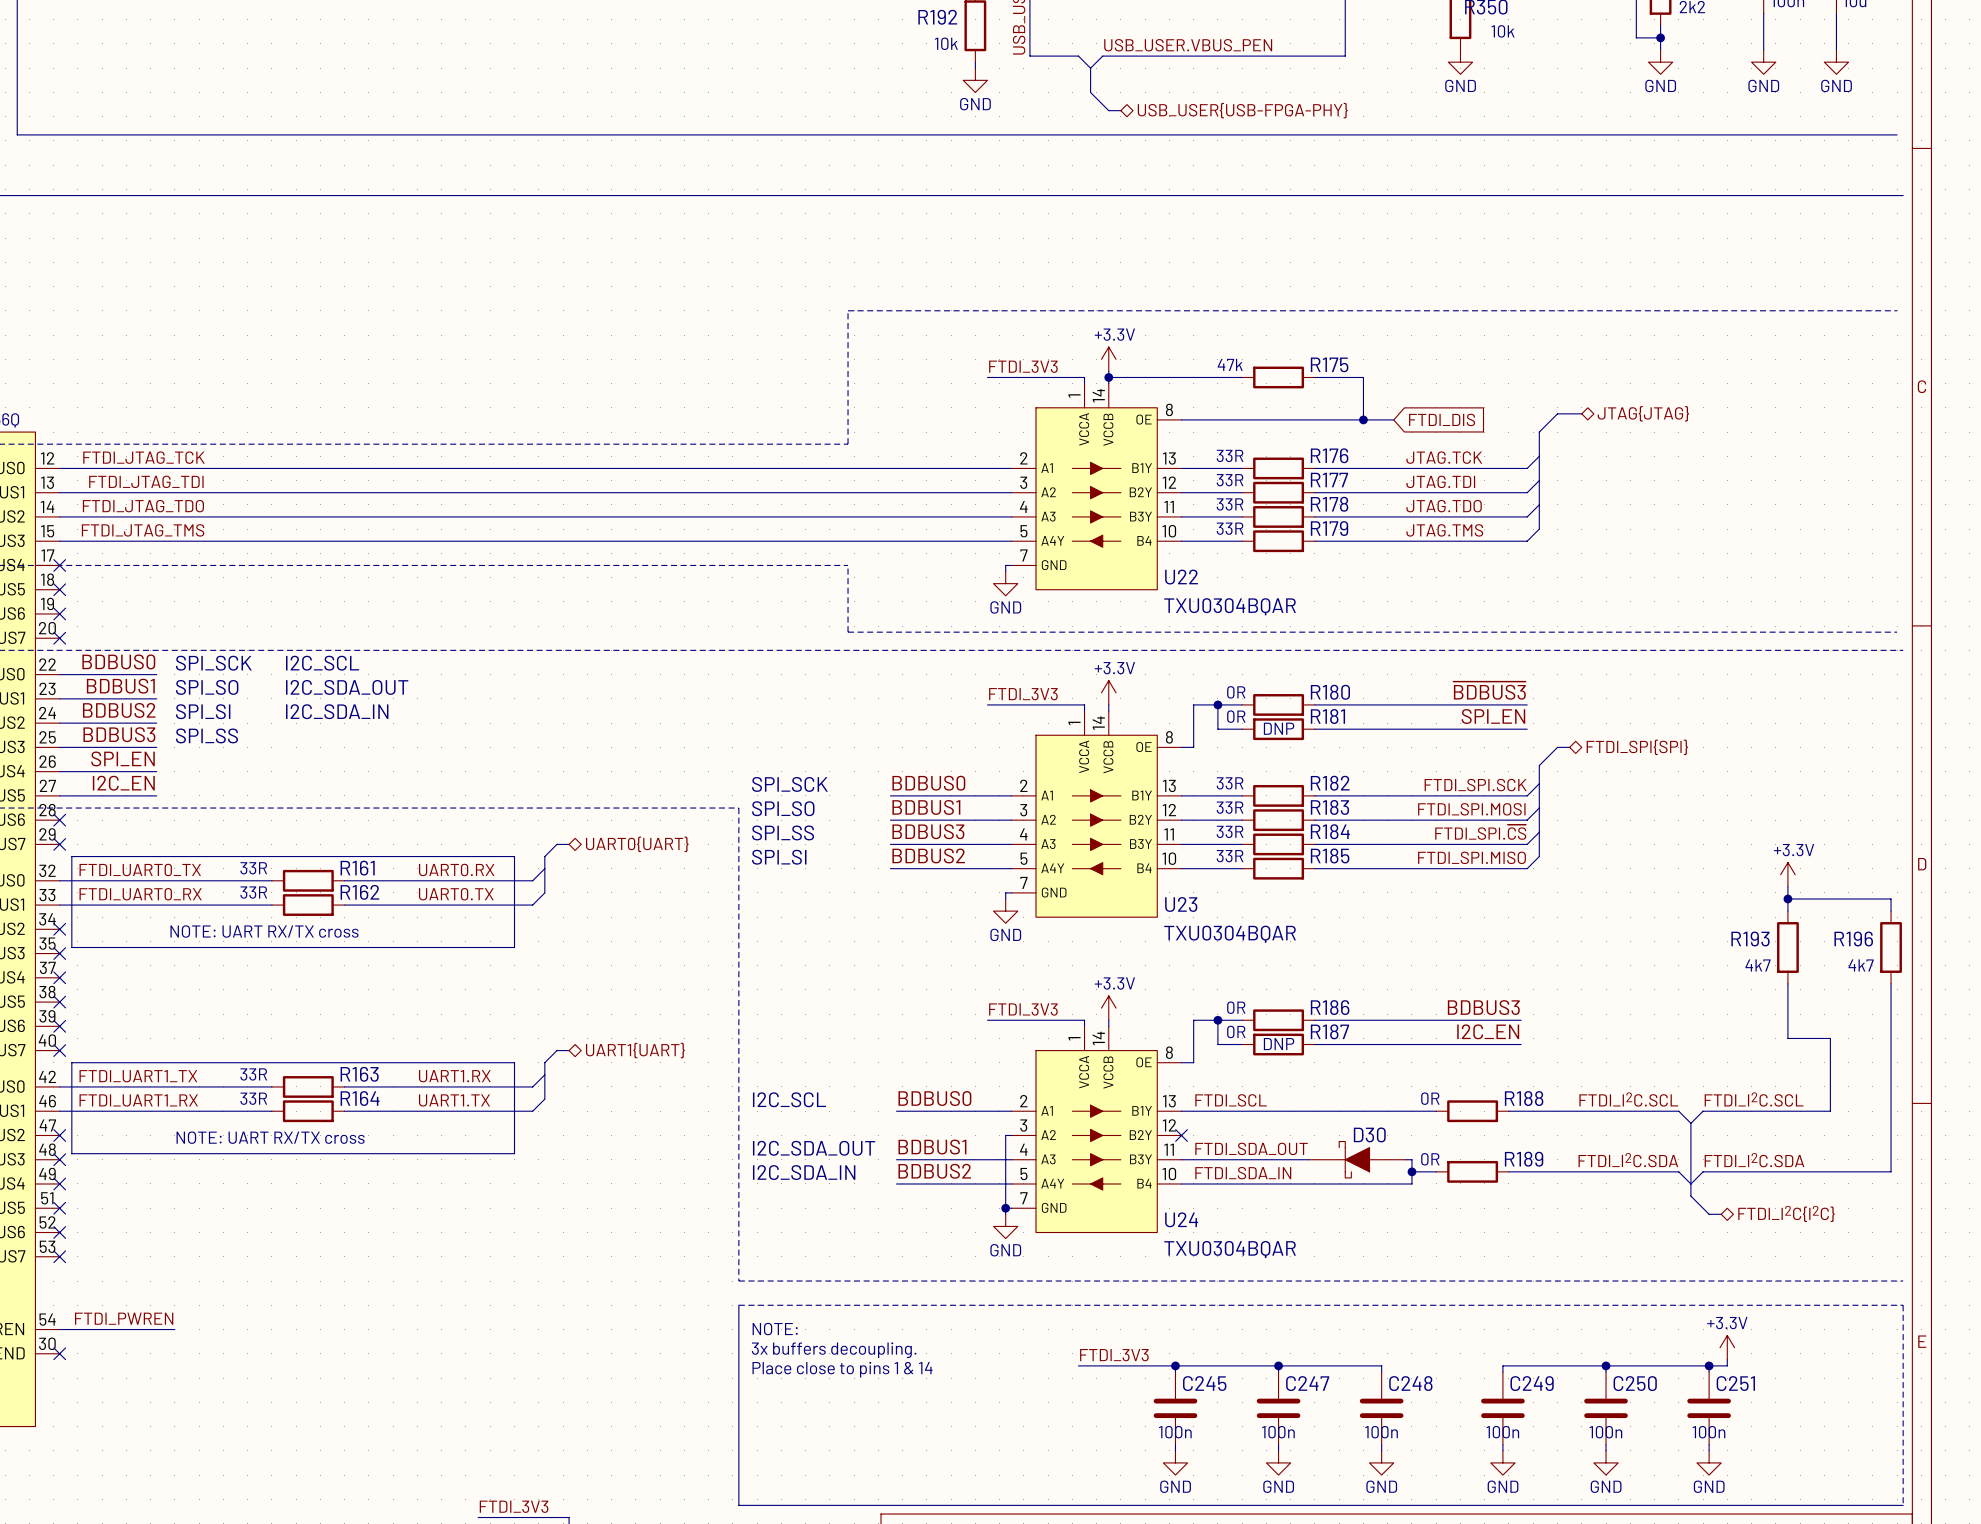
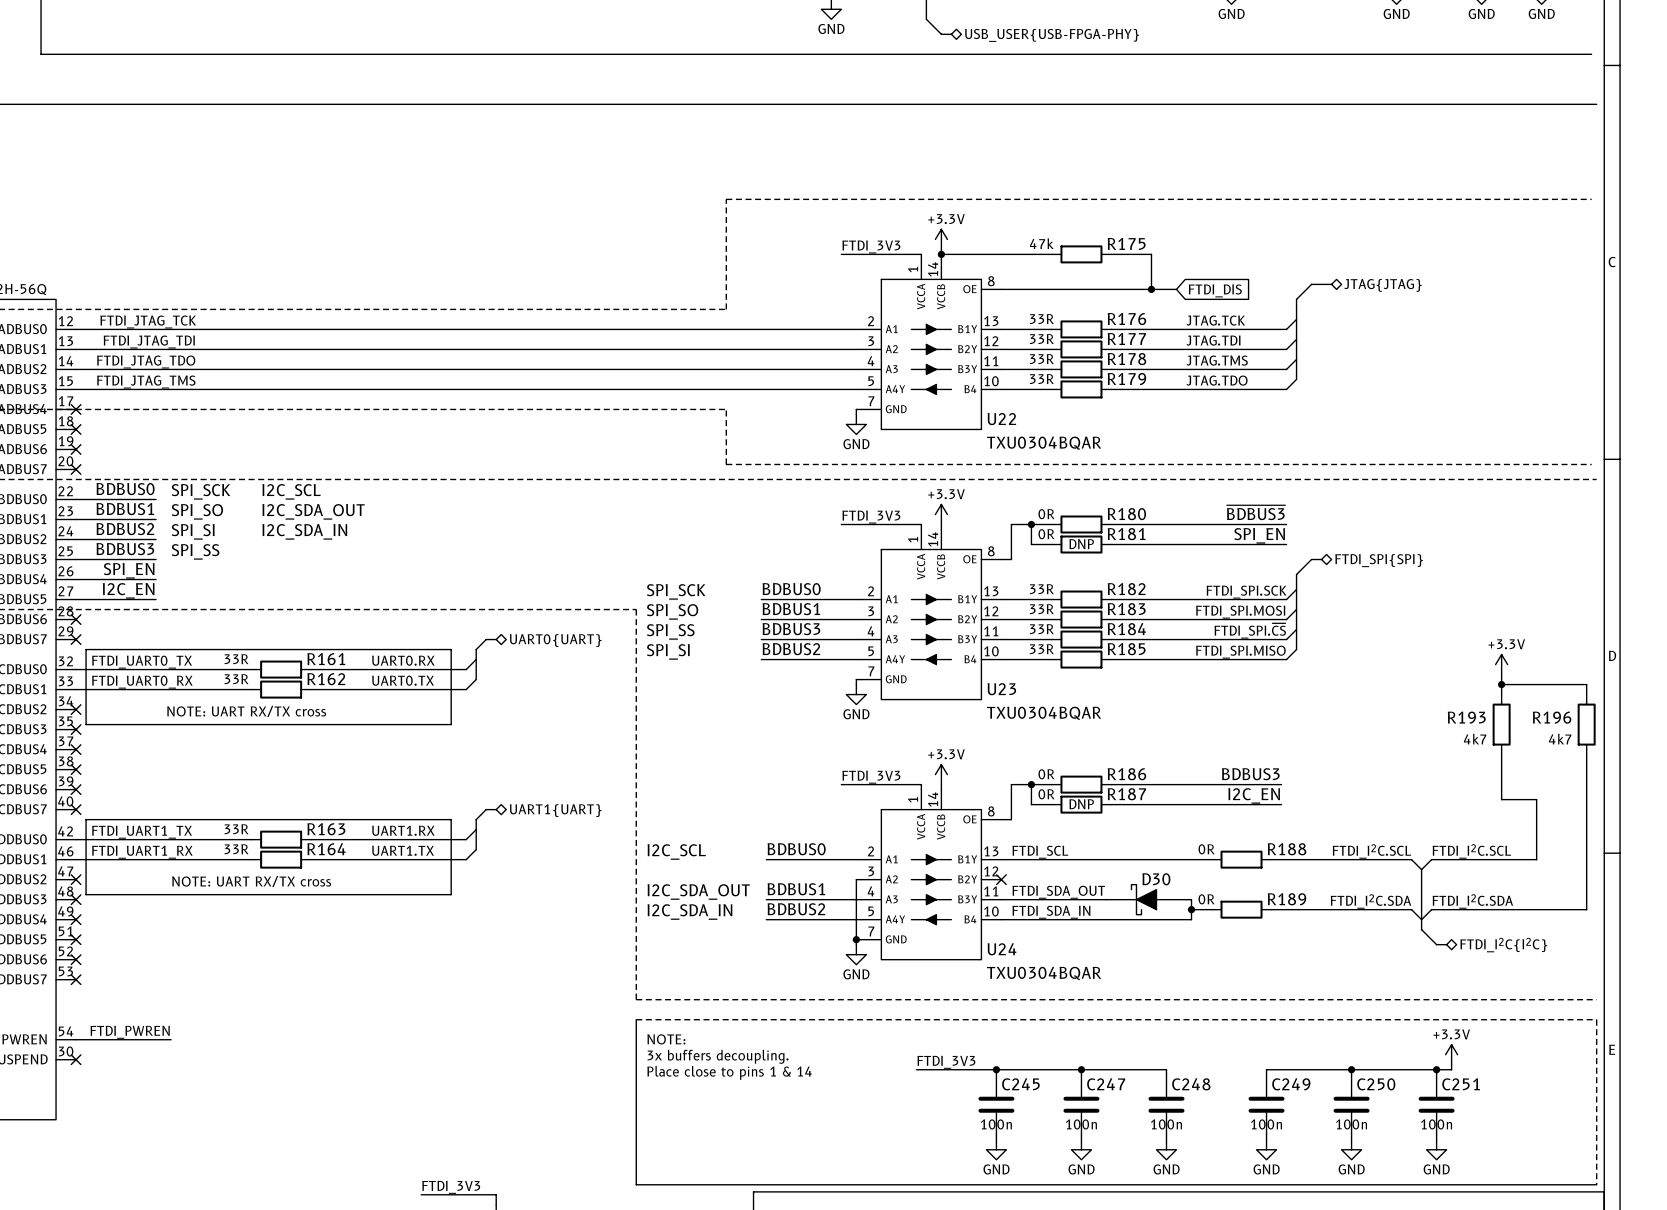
label: JTAG.TDO (1444, 506) -> JTAG.TMS (1217, 360)
label: JTAG.TMS (1444, 530) -> JTAG.TDO (1217, 380)

